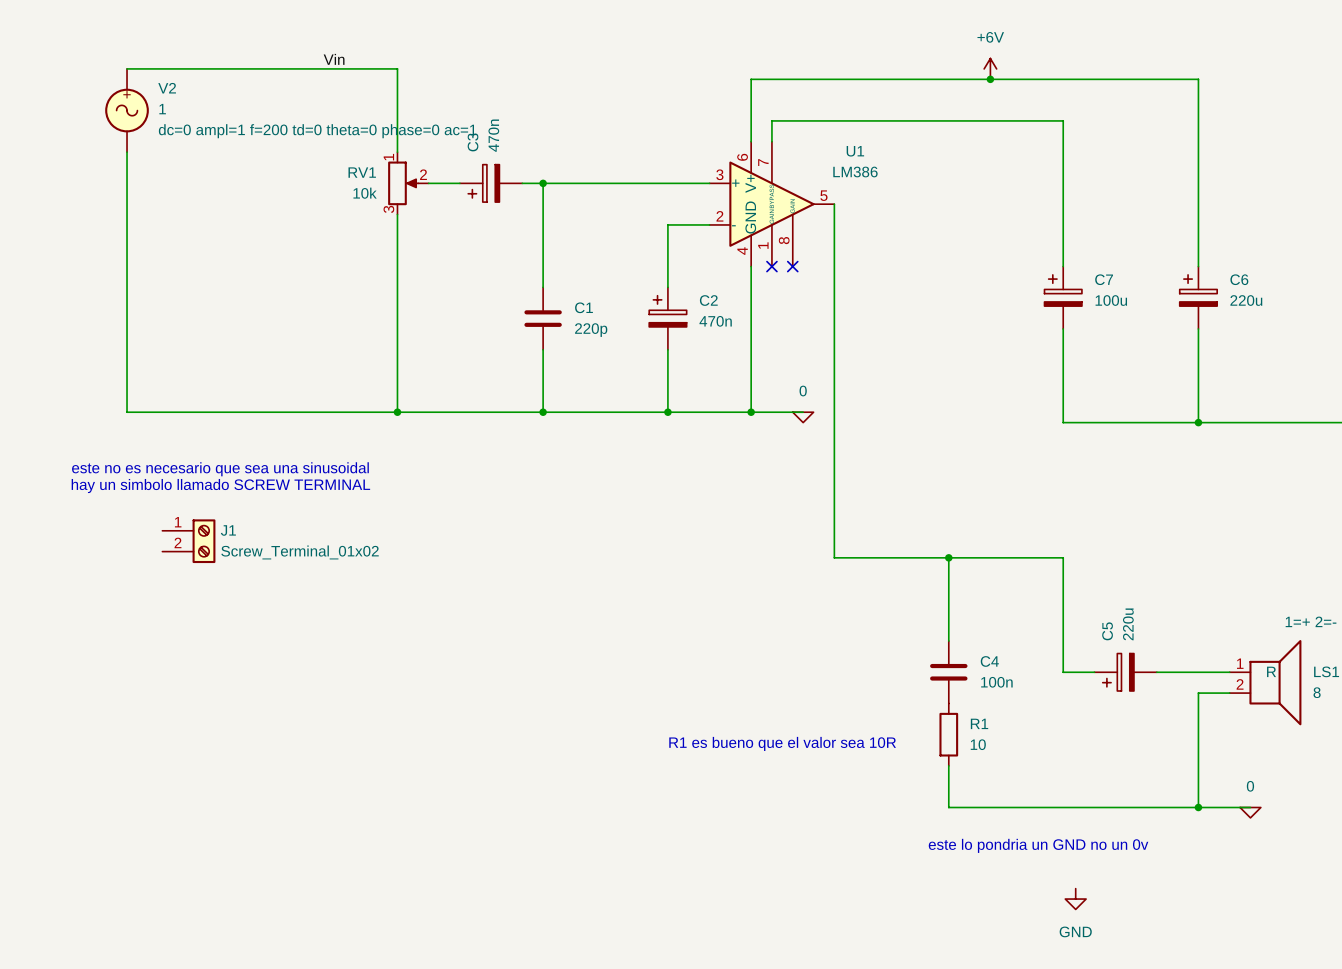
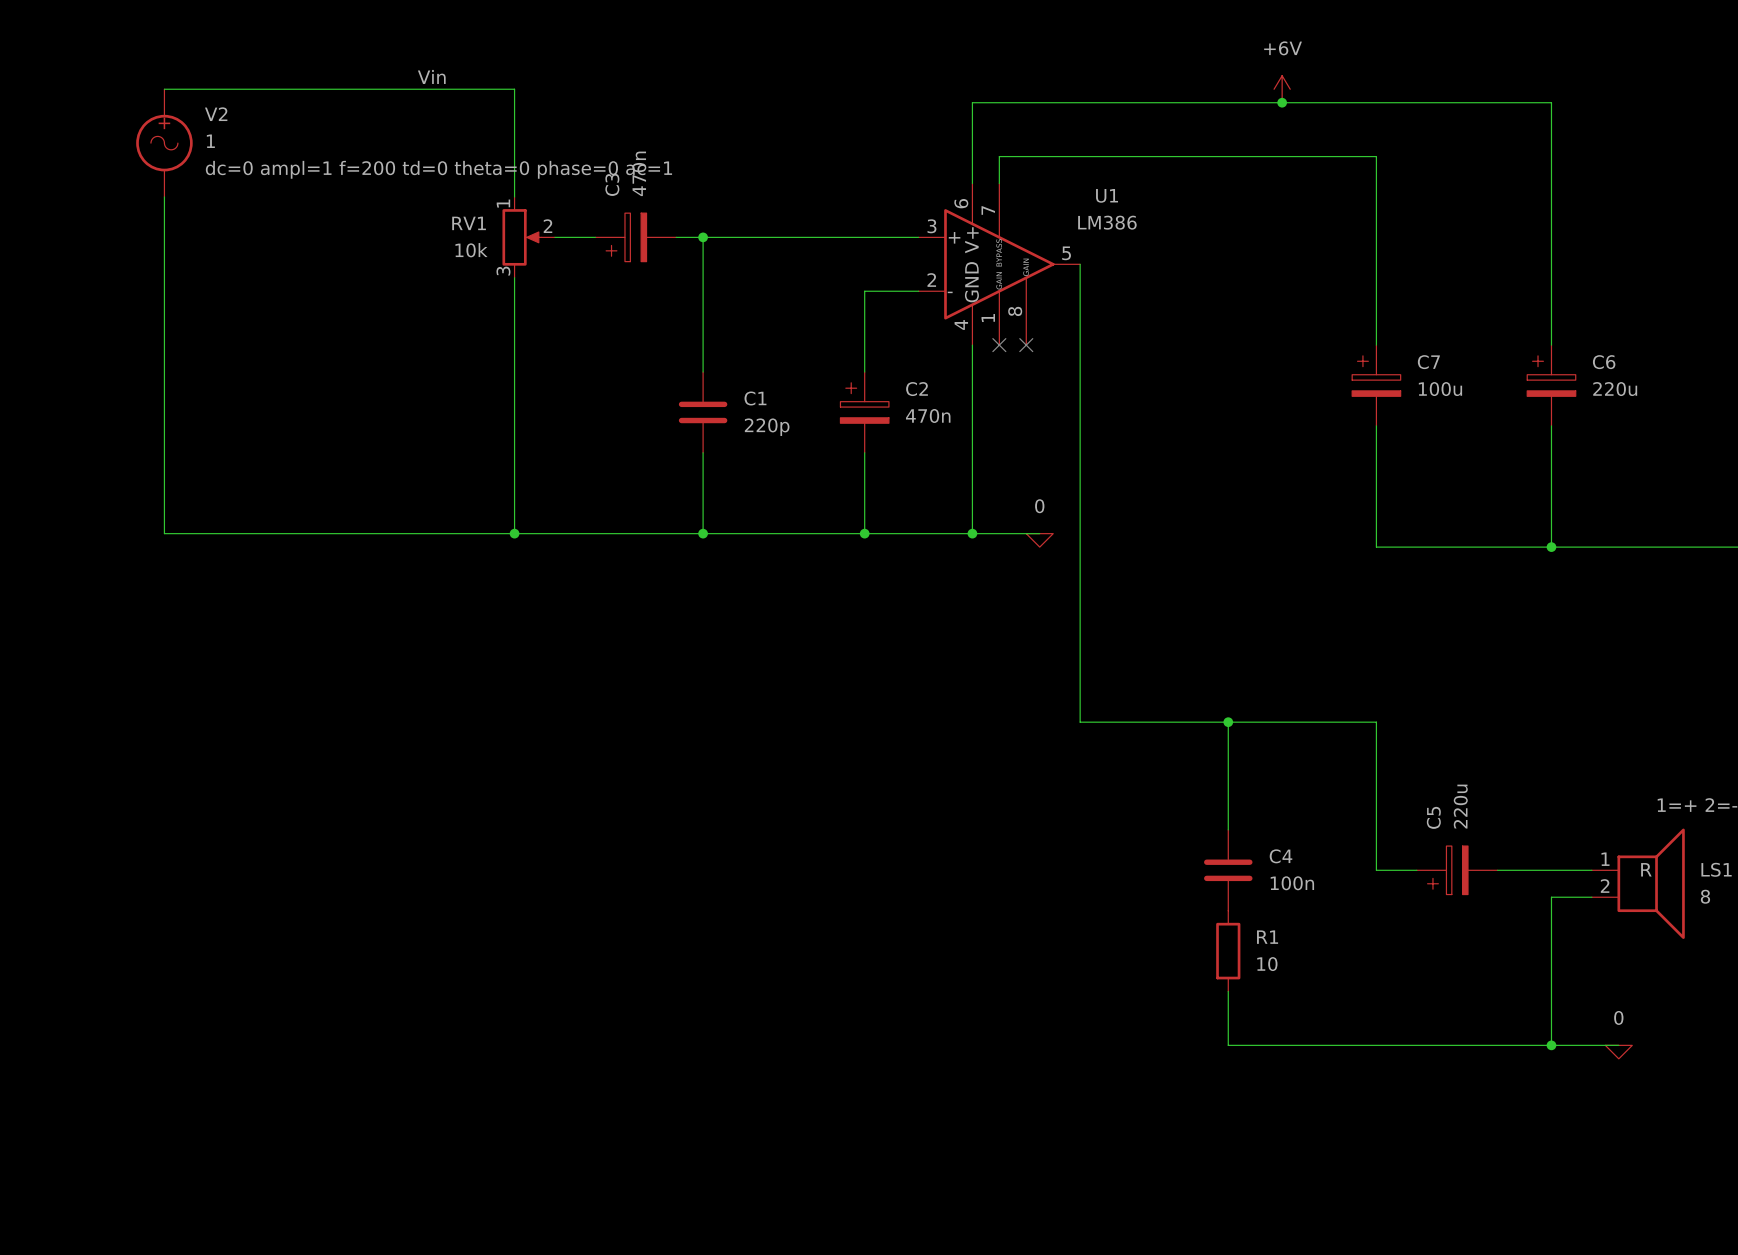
text: este no es necesario que sea una sinusoidal (220, 469) -> none
text: hay un simbolo llamado SCREW TERMINAL (220, 486) -> none
J1: Screw_Terminal_01x02 (188, 541) -> none
text: R1 es bueno que el valor sea 10R (782, 743) -> none
text: este lo pondria un GND no un 0v (1038, 845) -> none
power symbol: GND (1075, 899) -> none

